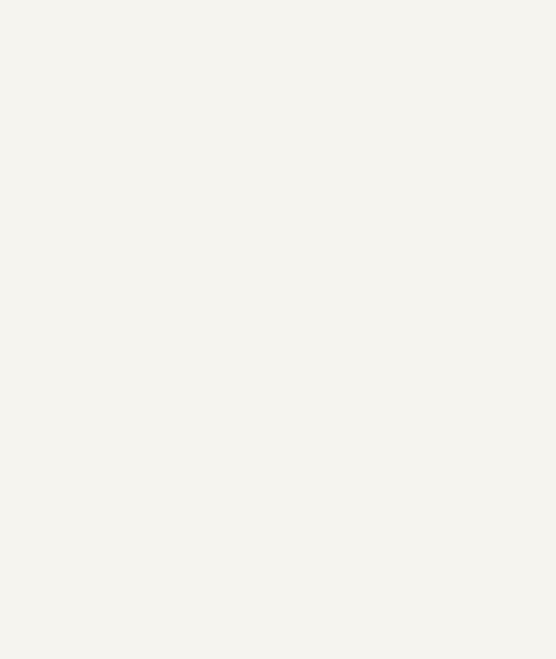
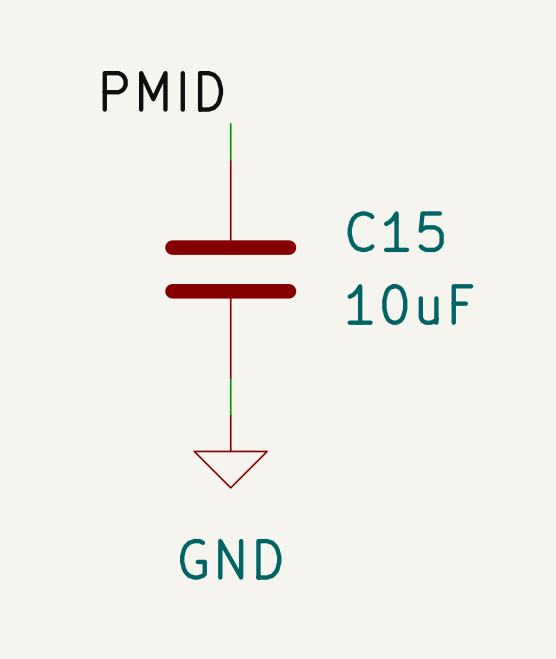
label: none -> PMID (162, 91)
wire: none -> (230, 123) (230, 160)
C15: none -> 10uF (230, 269)
wire: none -> (230, 378) (230, 415)
power symbol: none -> GND (230, 451)

